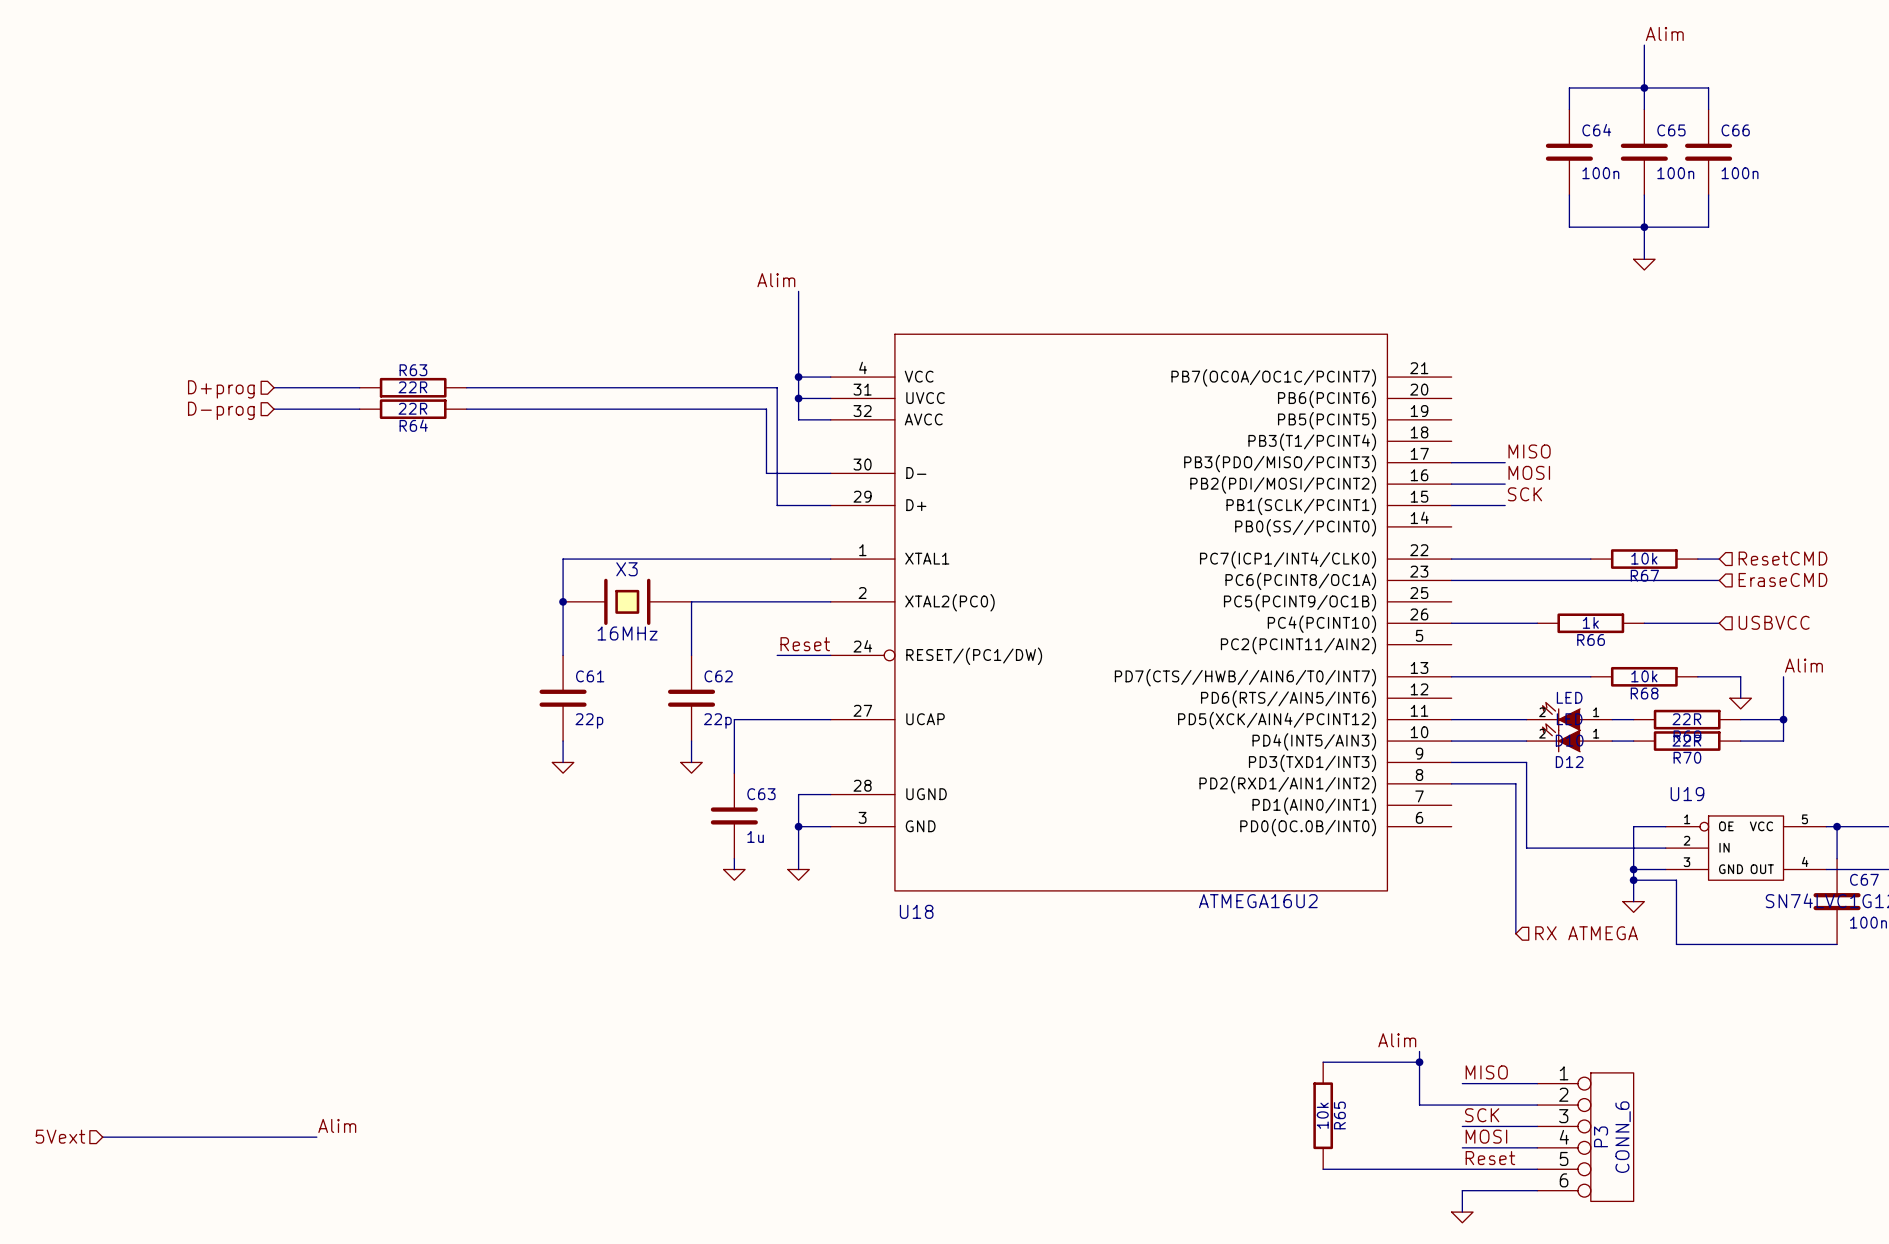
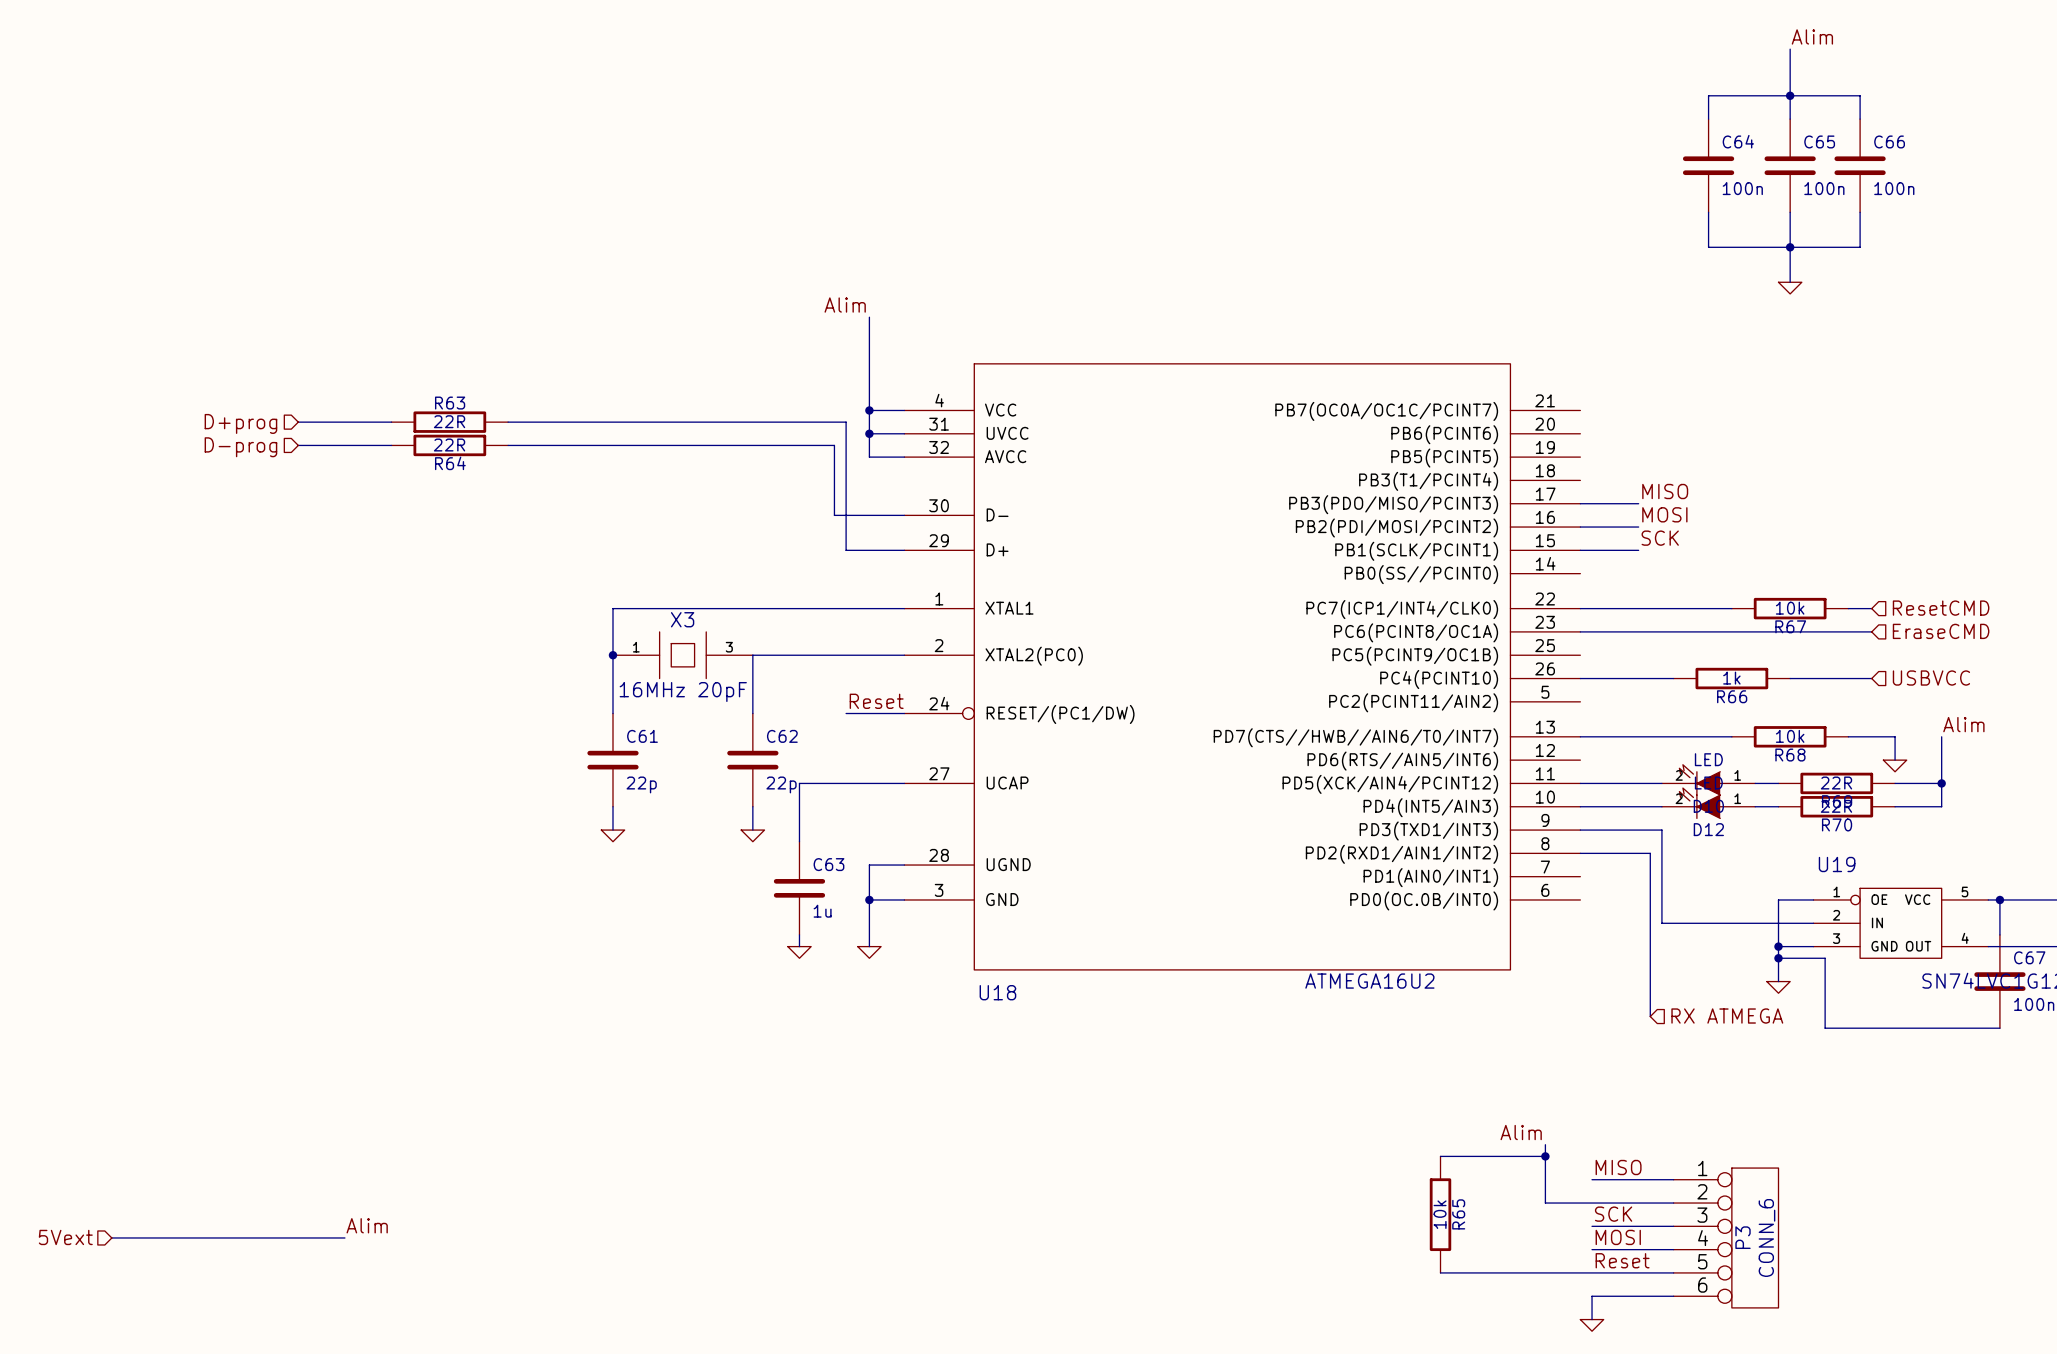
X3 symbol: [563, 578, 692, 625] -> [612, 631, 753, 679]
X3 value: 16MHz (627, 633) -> 16MHz 20pF (683, 692)

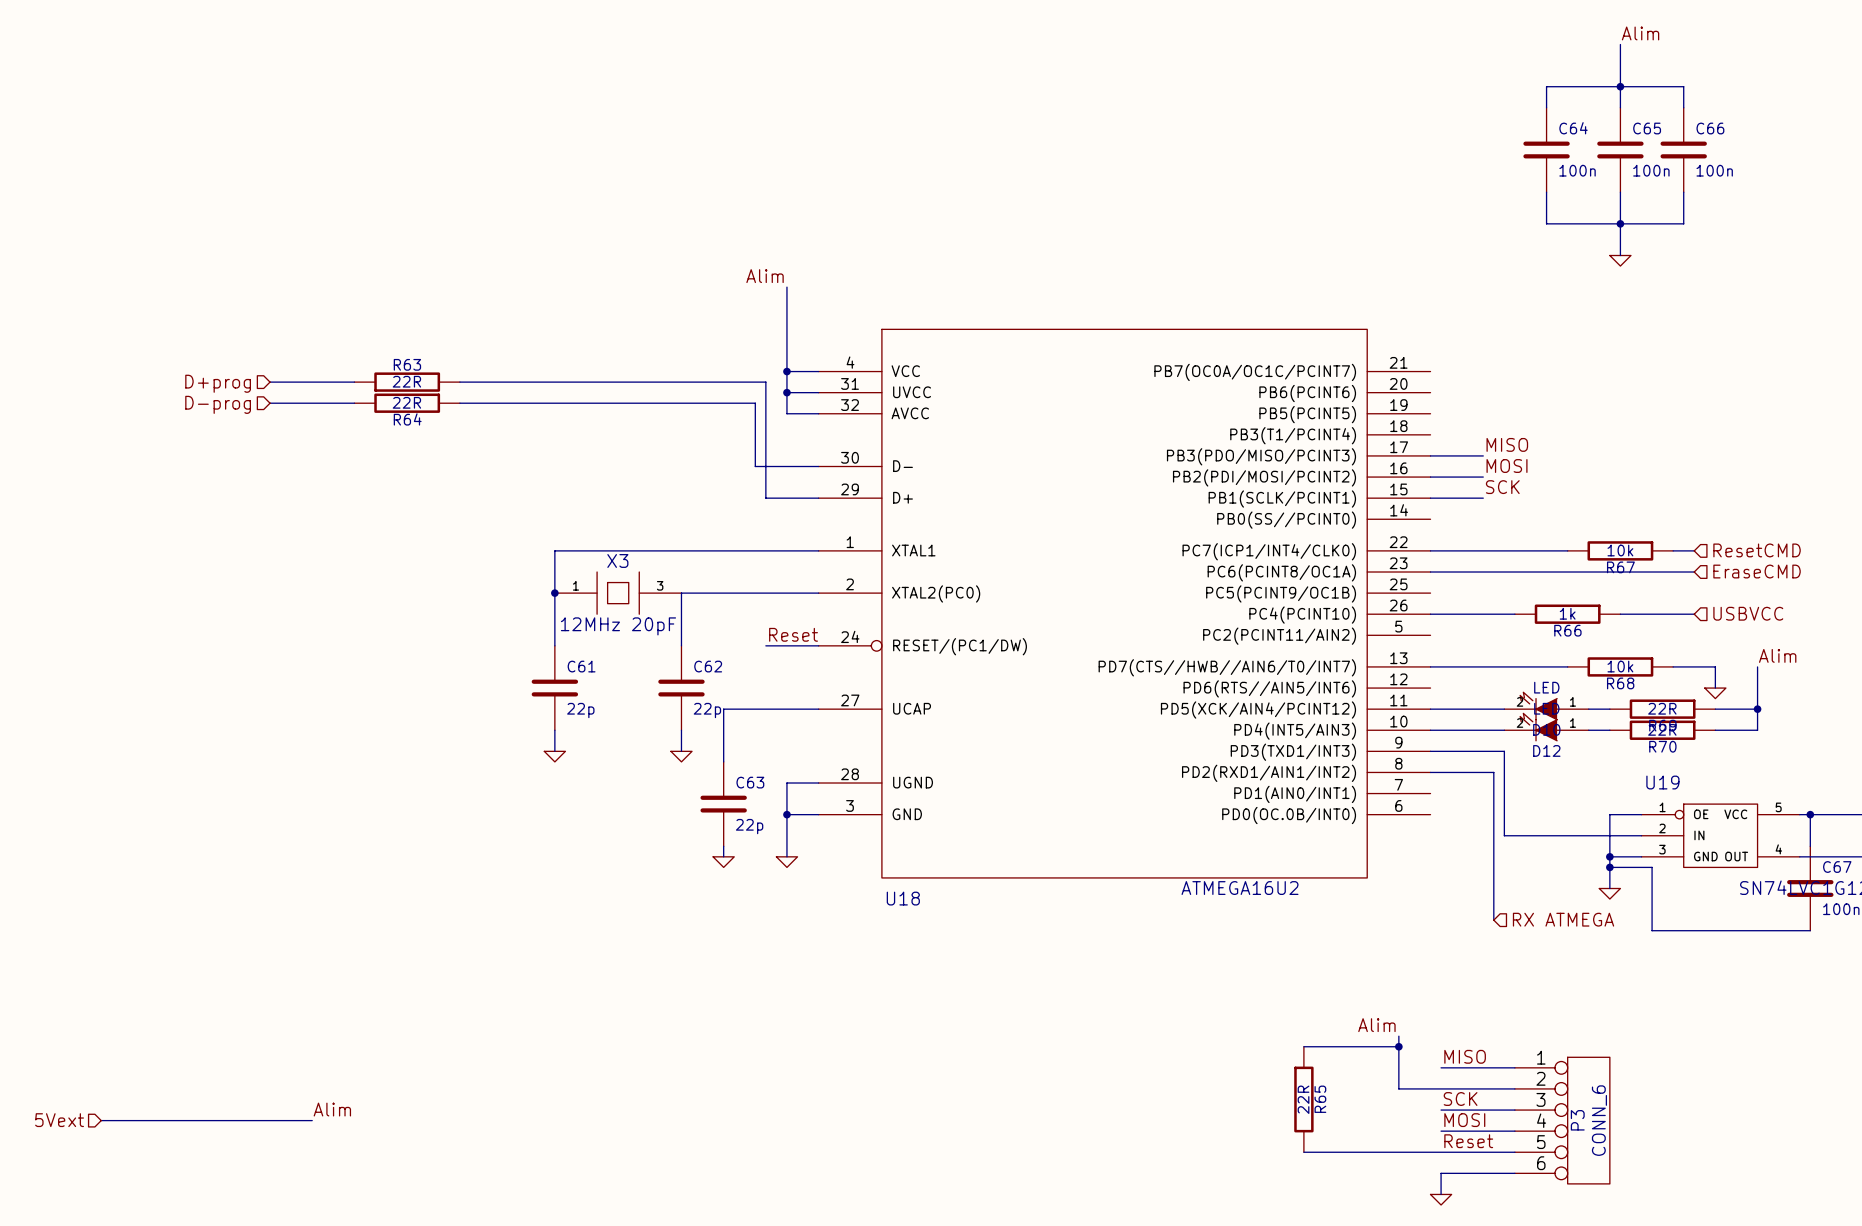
X3 value: 16MHz 20pF (683, 692) -> 12MHz 20pF (618, 626)
C63 value: 1u (822, 911) -> 22p (749, 826)
R65 value: 10k (1440, 1214) -> 22R (1303, 1099)

